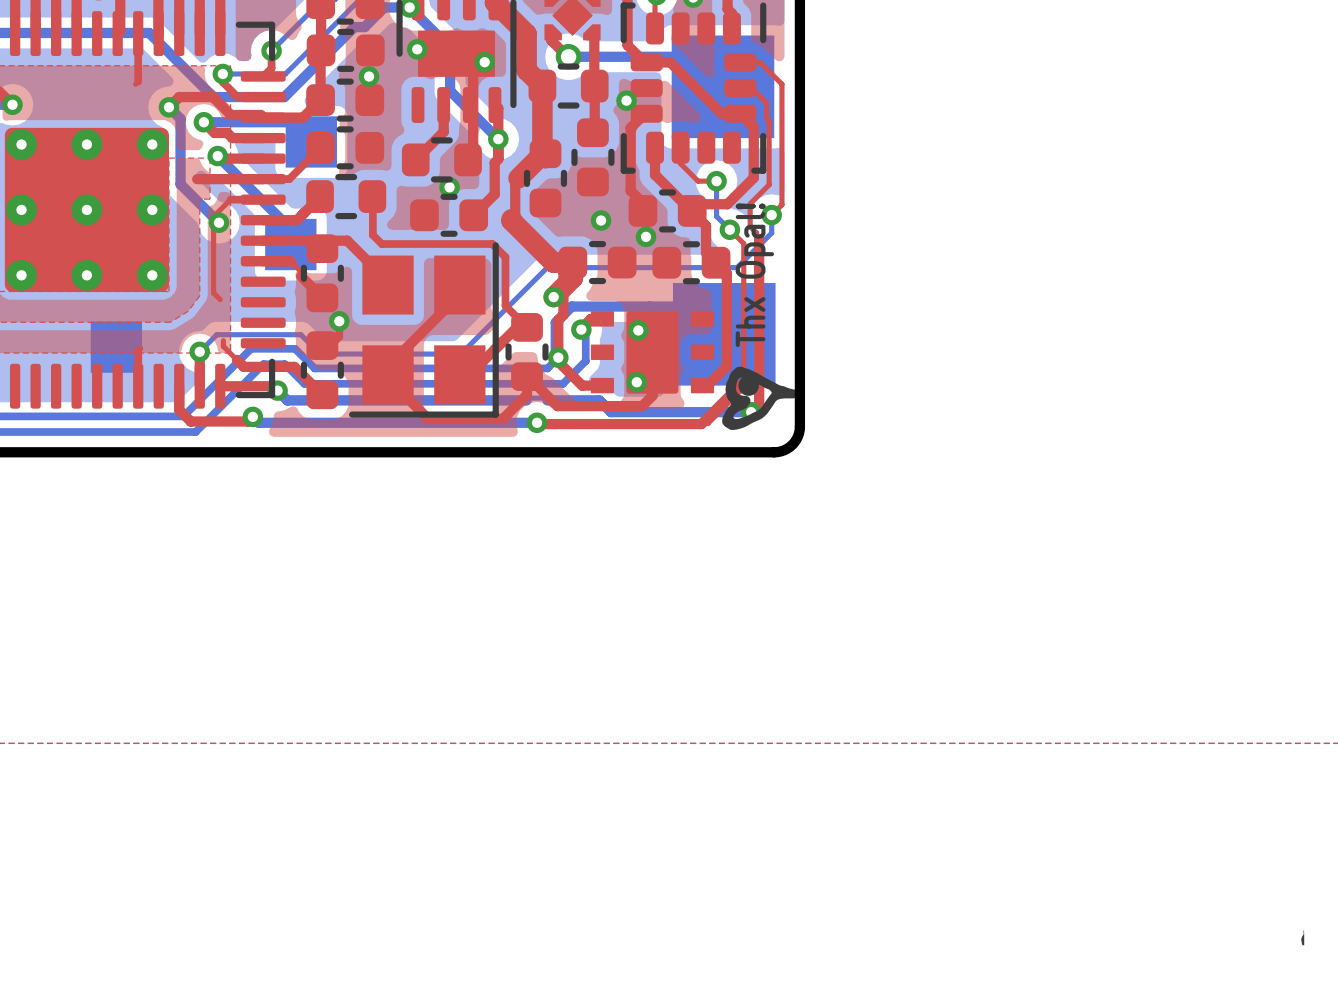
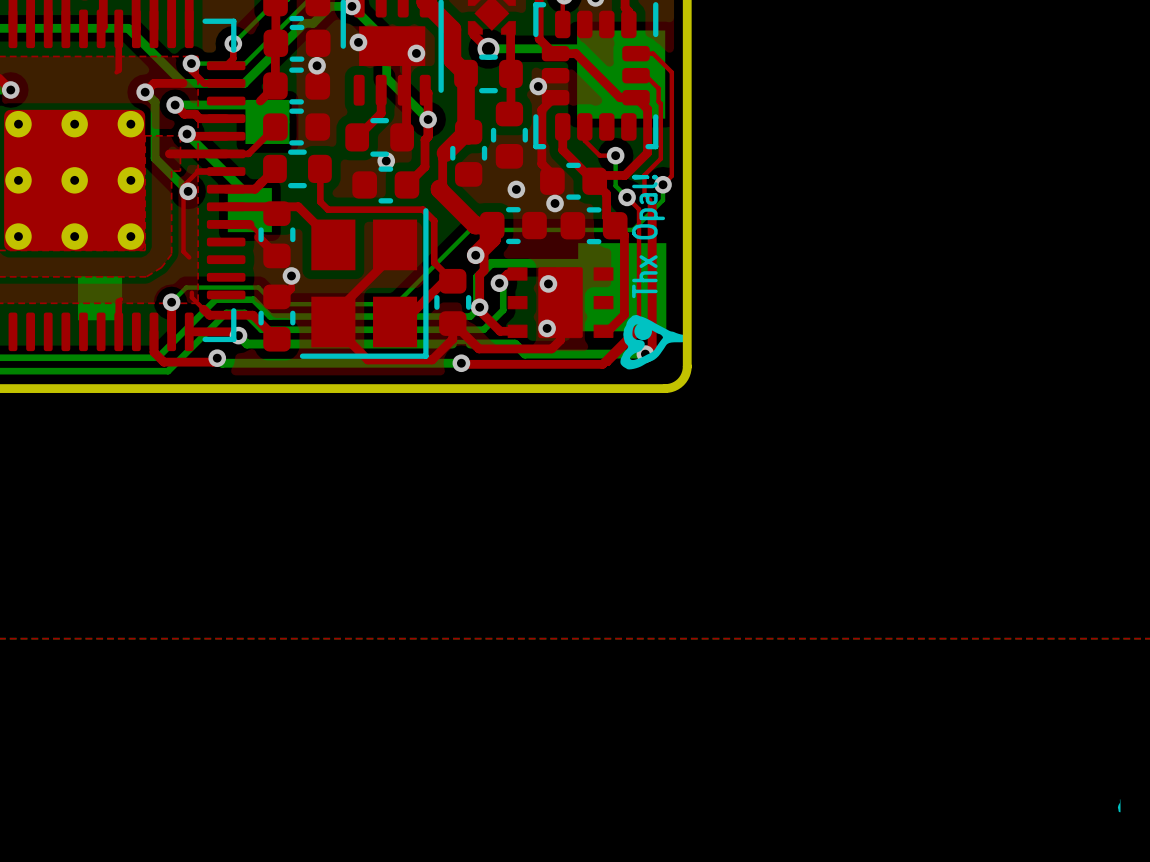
top track: (212, 97) (230, 115) (303, 117) -> none

